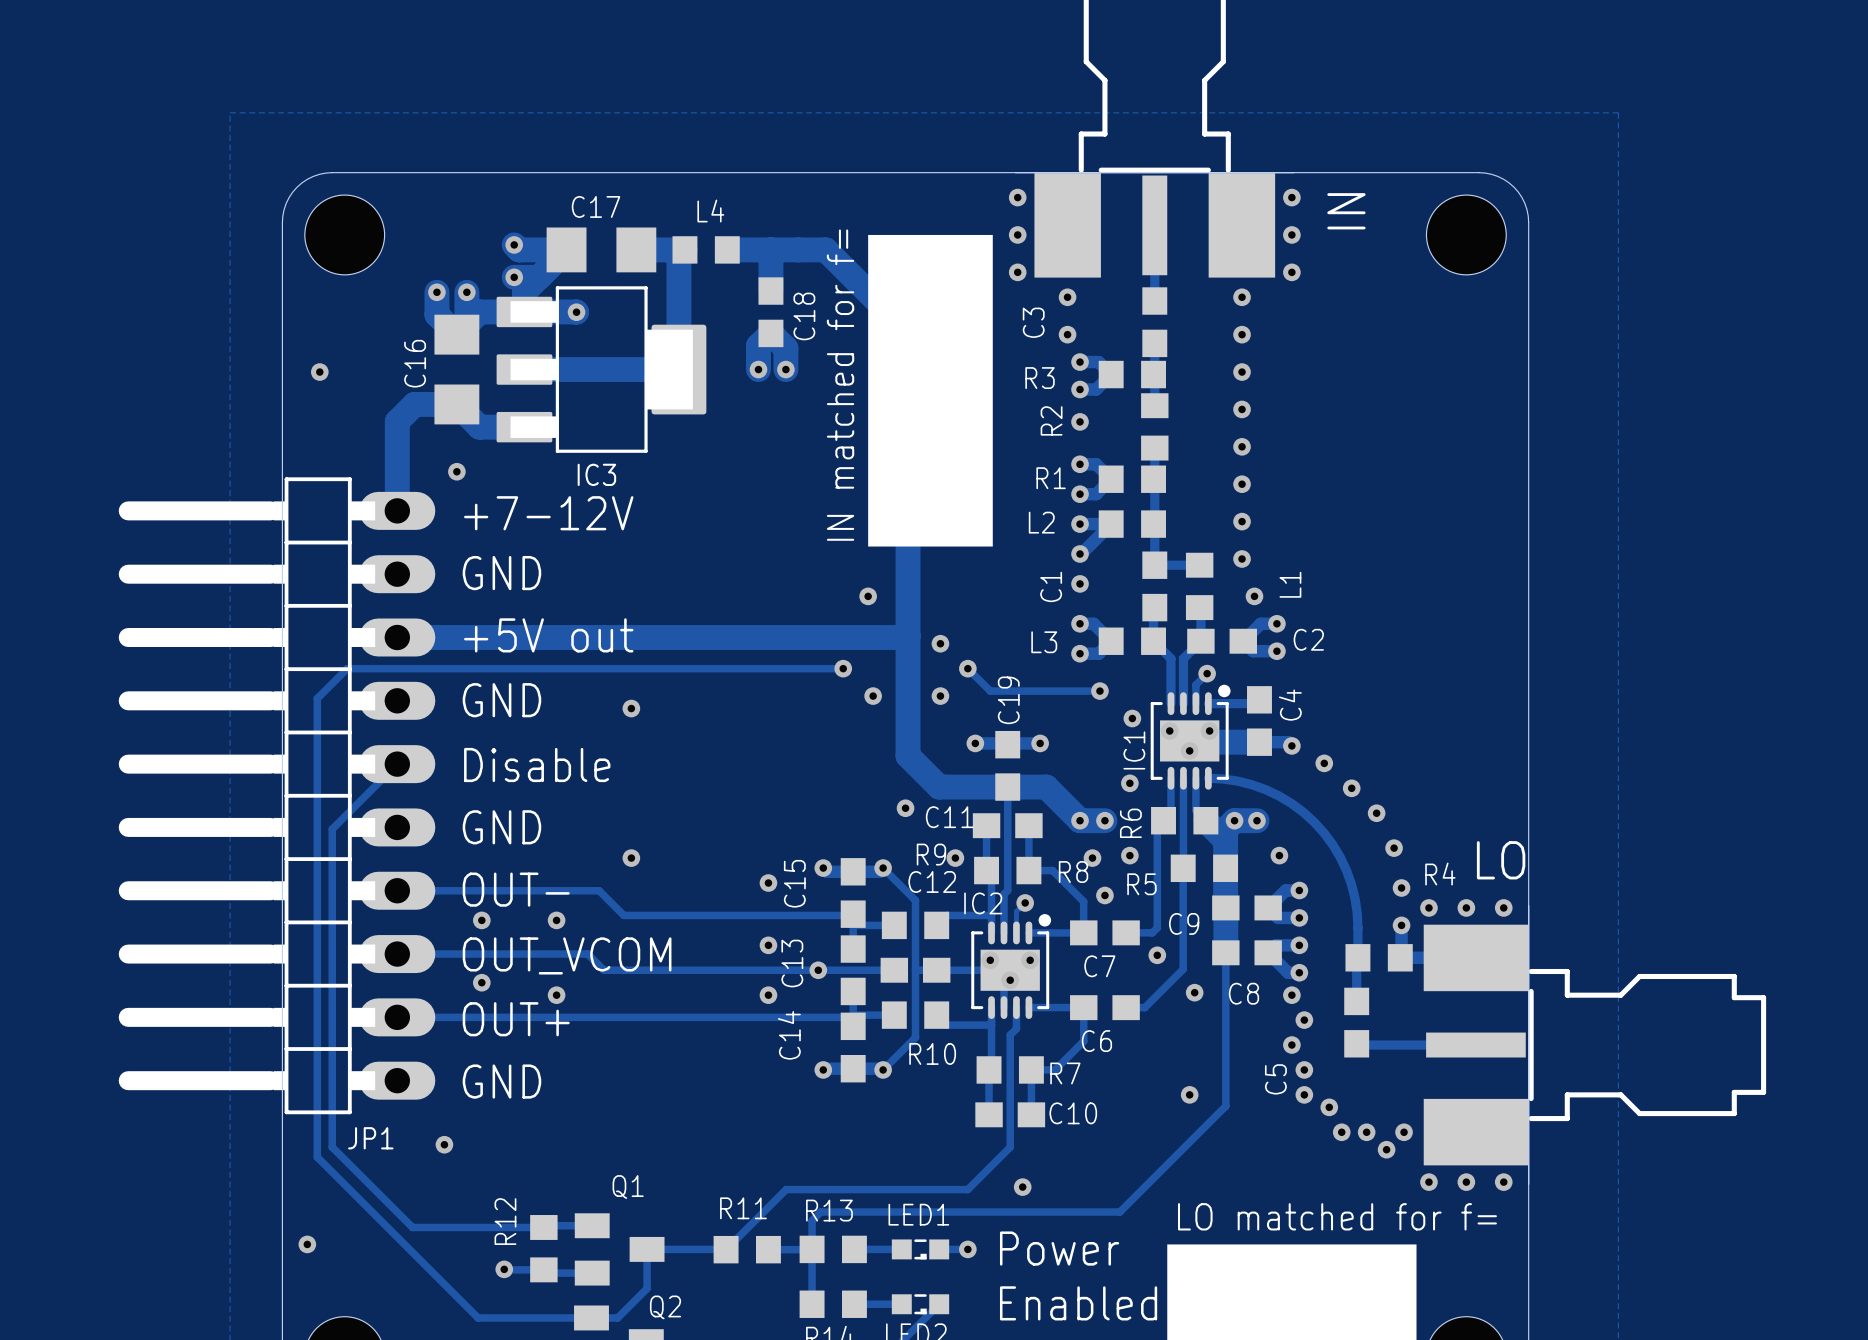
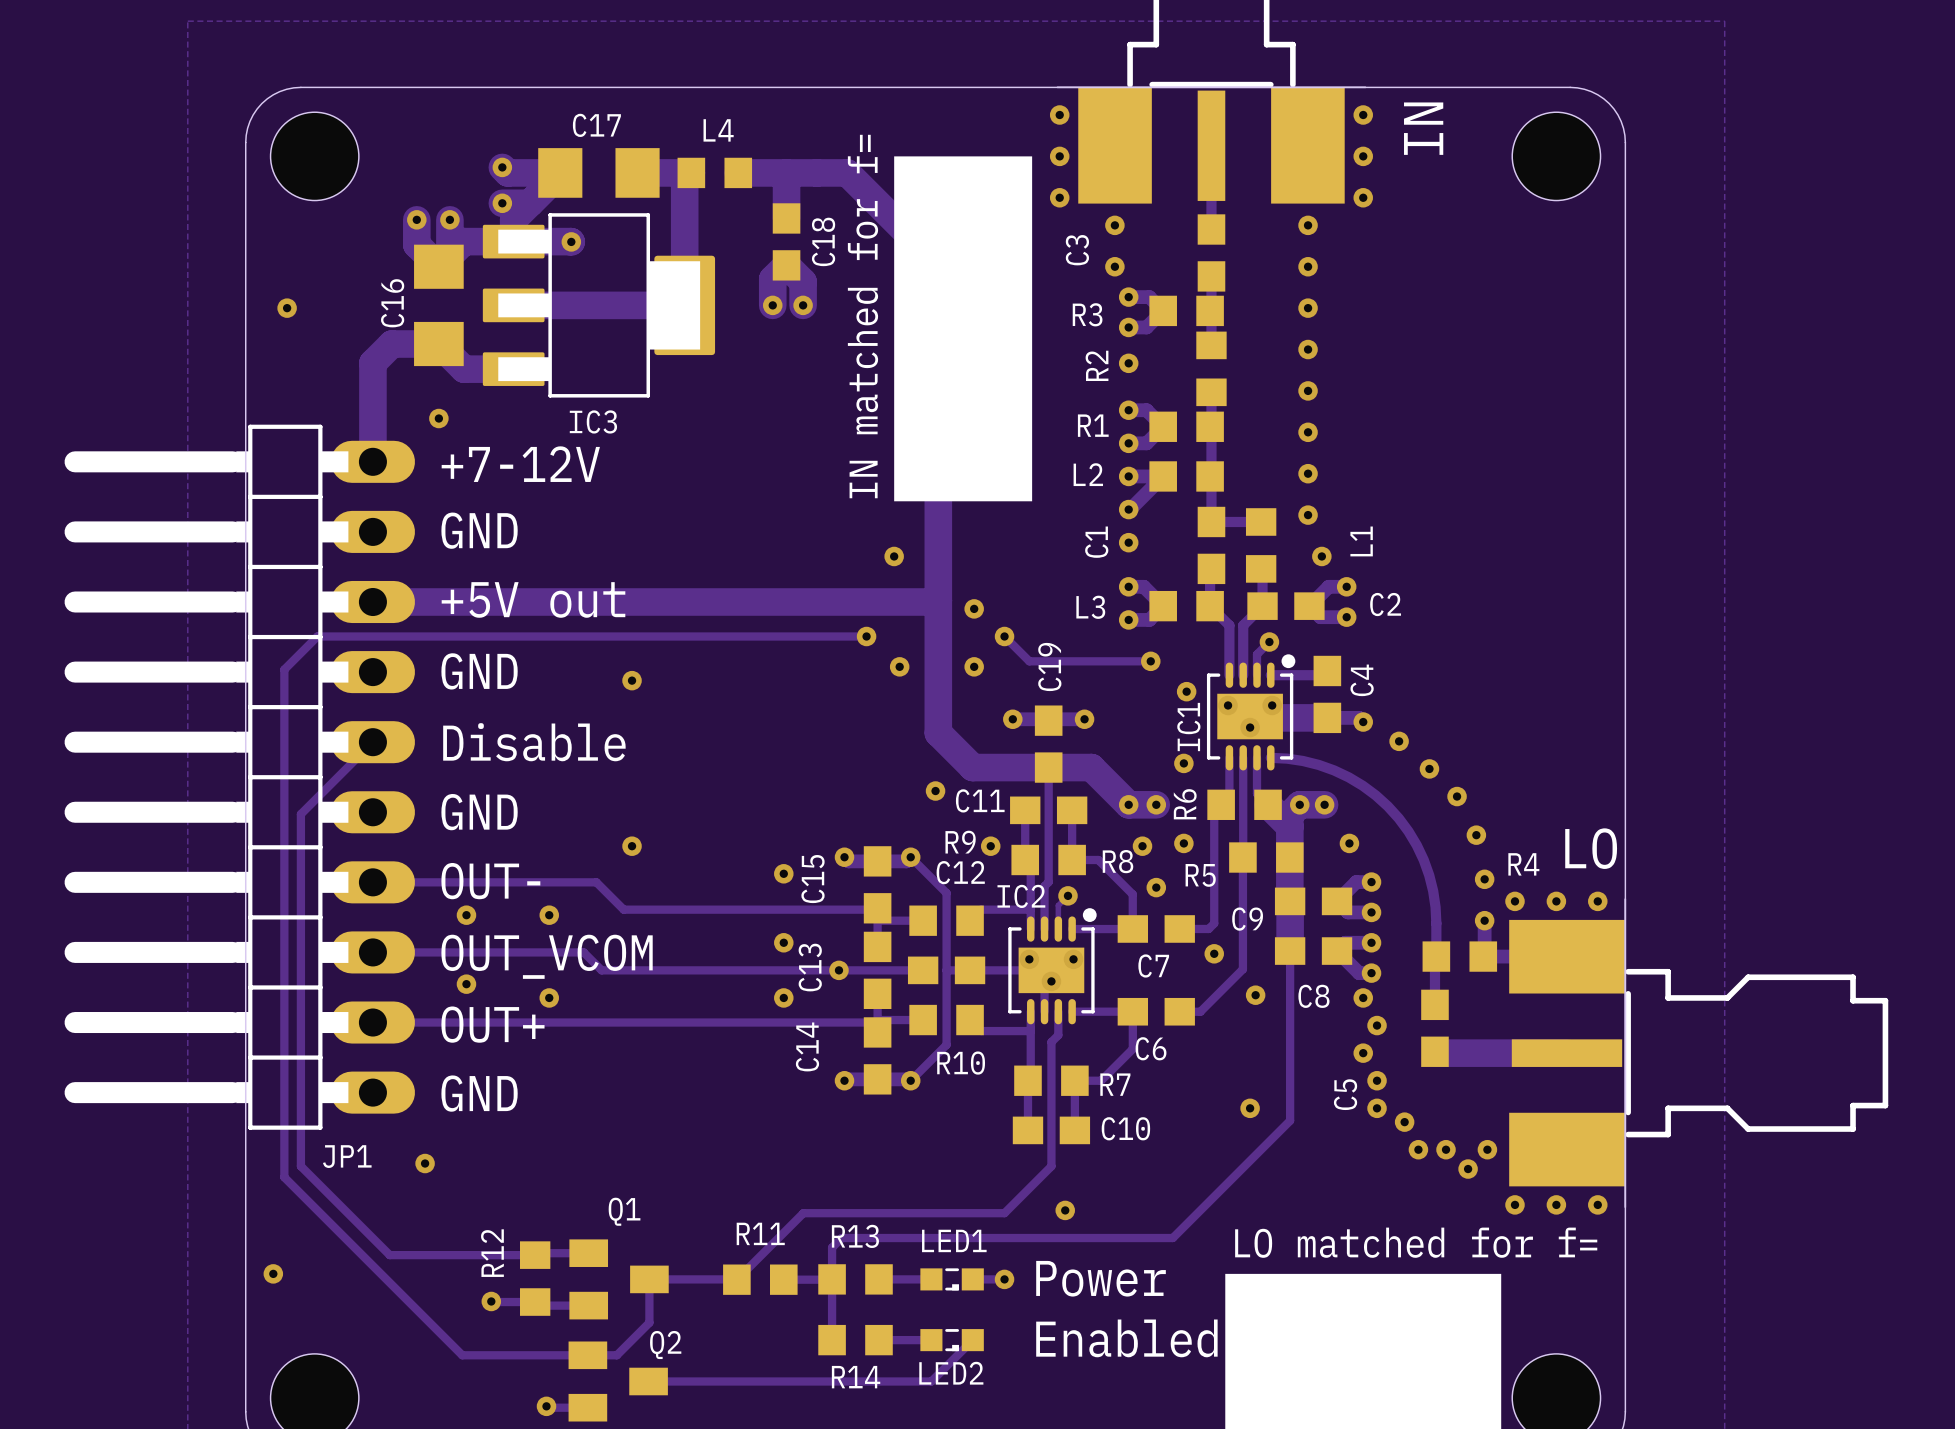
track width: thin (1357, 1045) (1475, 1045) -> thick (1436, 1053) (1567, 1053)

